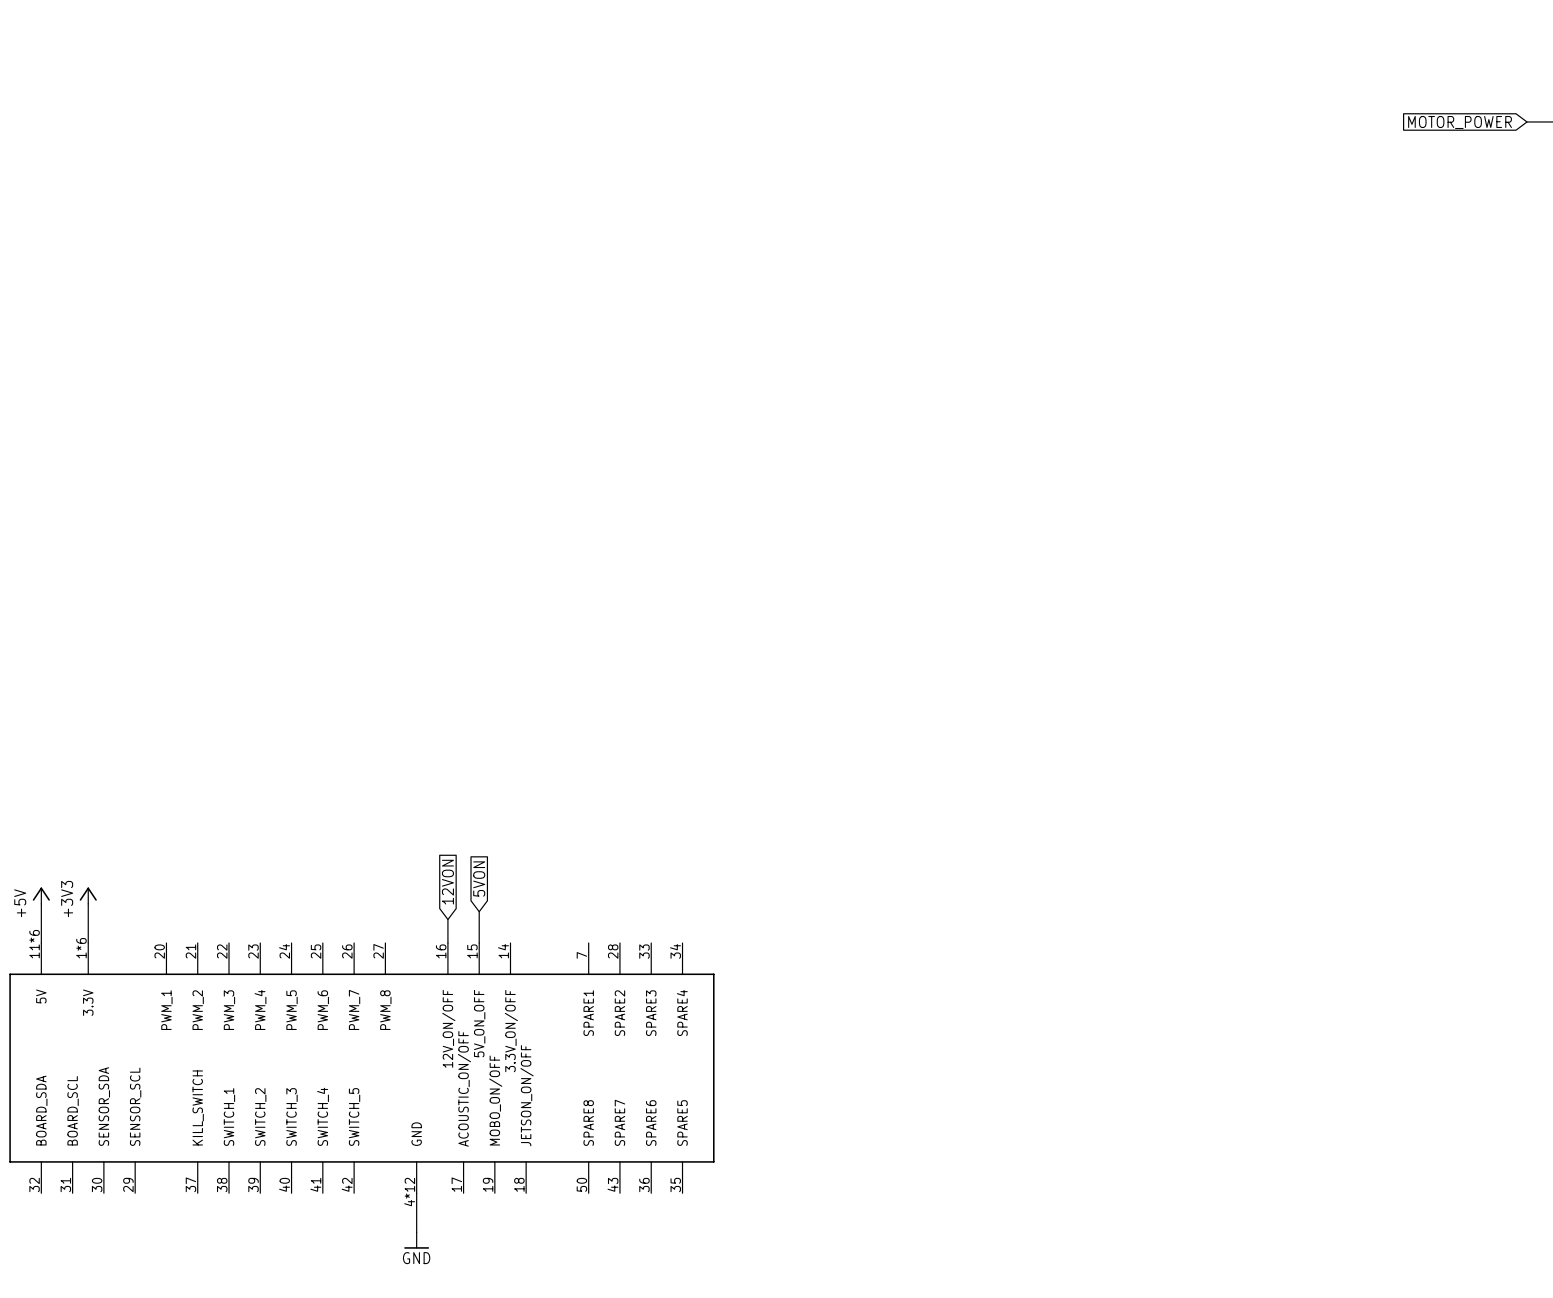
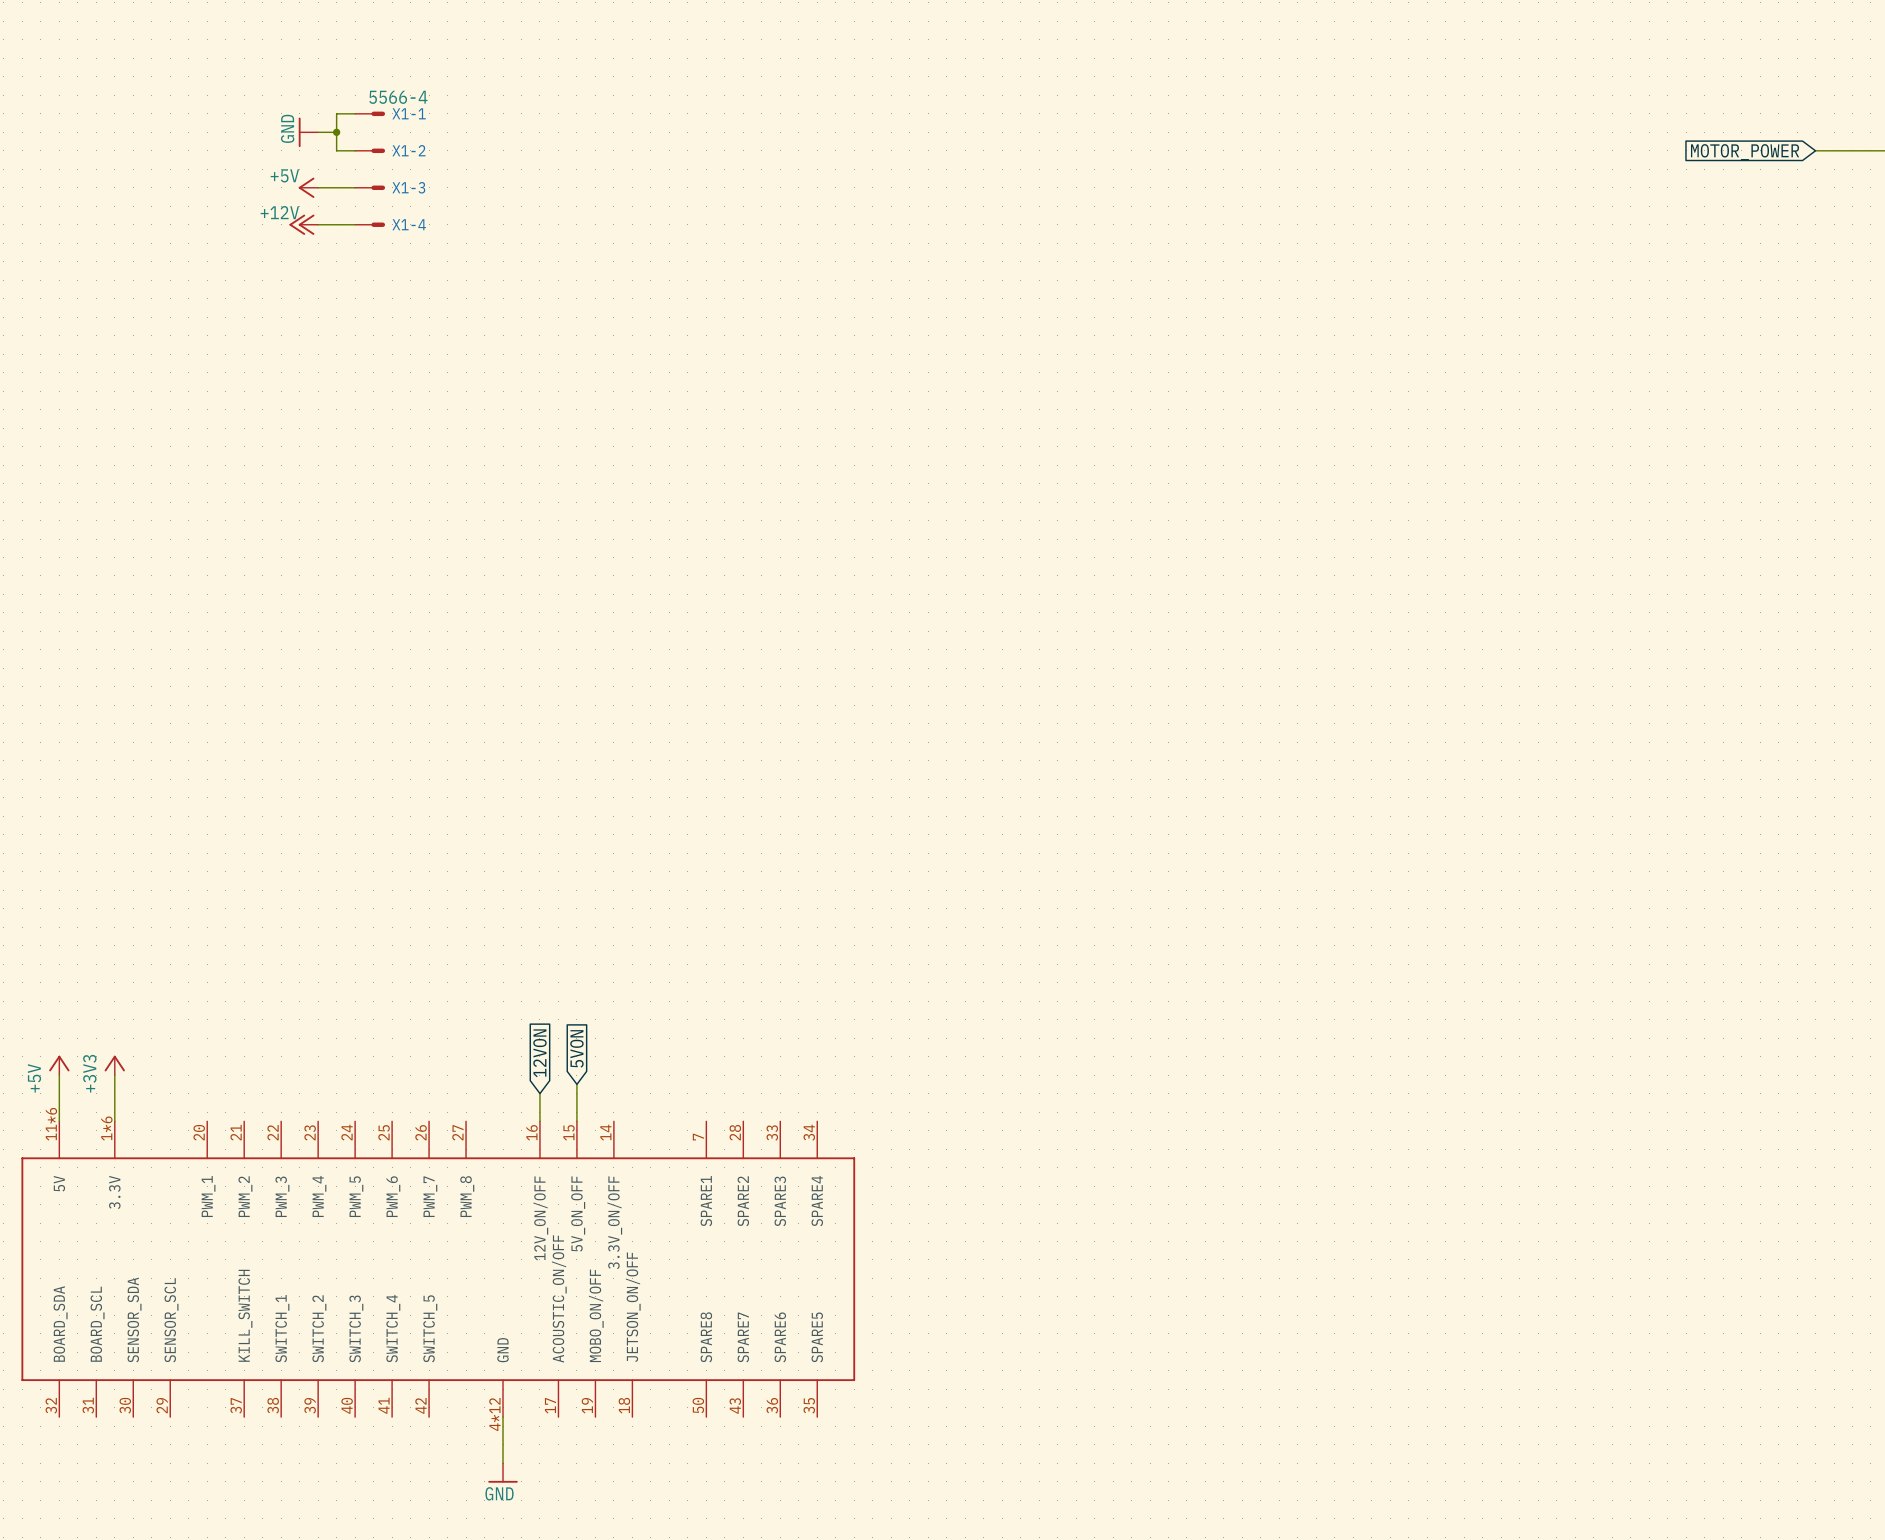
wire: none -> (355, 113) (336, 113) (336, 150) (355, 150)
X1-1: none -> 5566-4 (370, 113)
power symbol: none -> GND (308, 132)
wire: none -> (318, 132) (336, 132)
junction: none -> (336, 132)
X1-2: none -> (370, 150)
power symbol: none -> +5V (308, 187)
wire: none -> (318, 187) (355, 187)
X1-3: none -> (370, 187)
power symbol: none -> +12V (303, 224)
wire: none -> (318, 224) (355, 224)
X1-4: none -> (370, 224)

